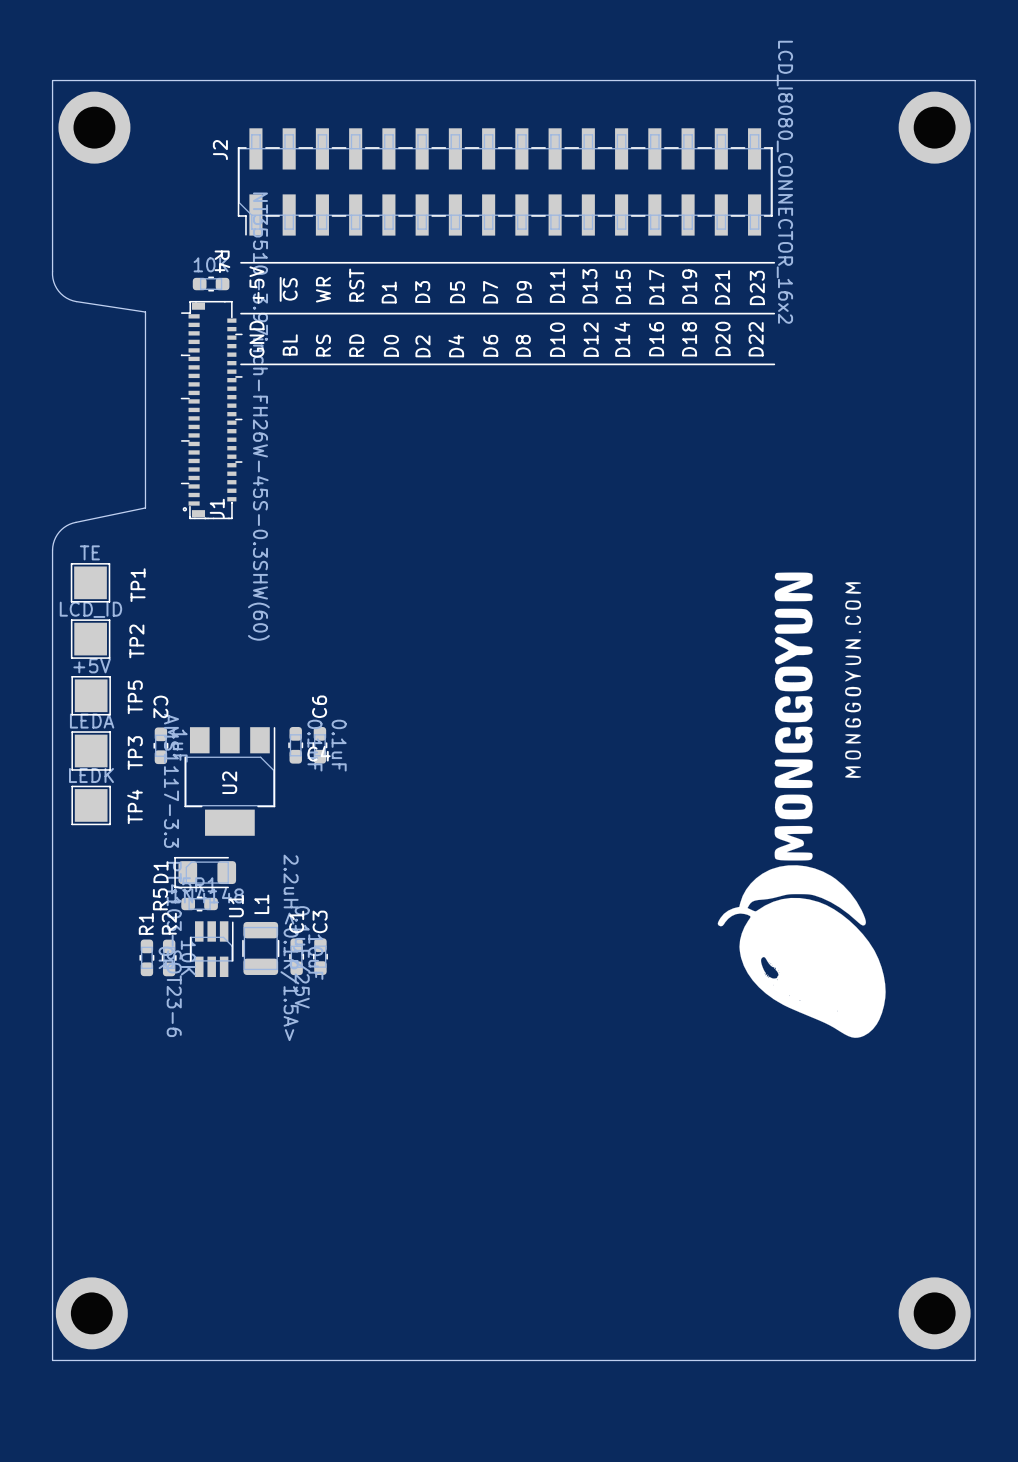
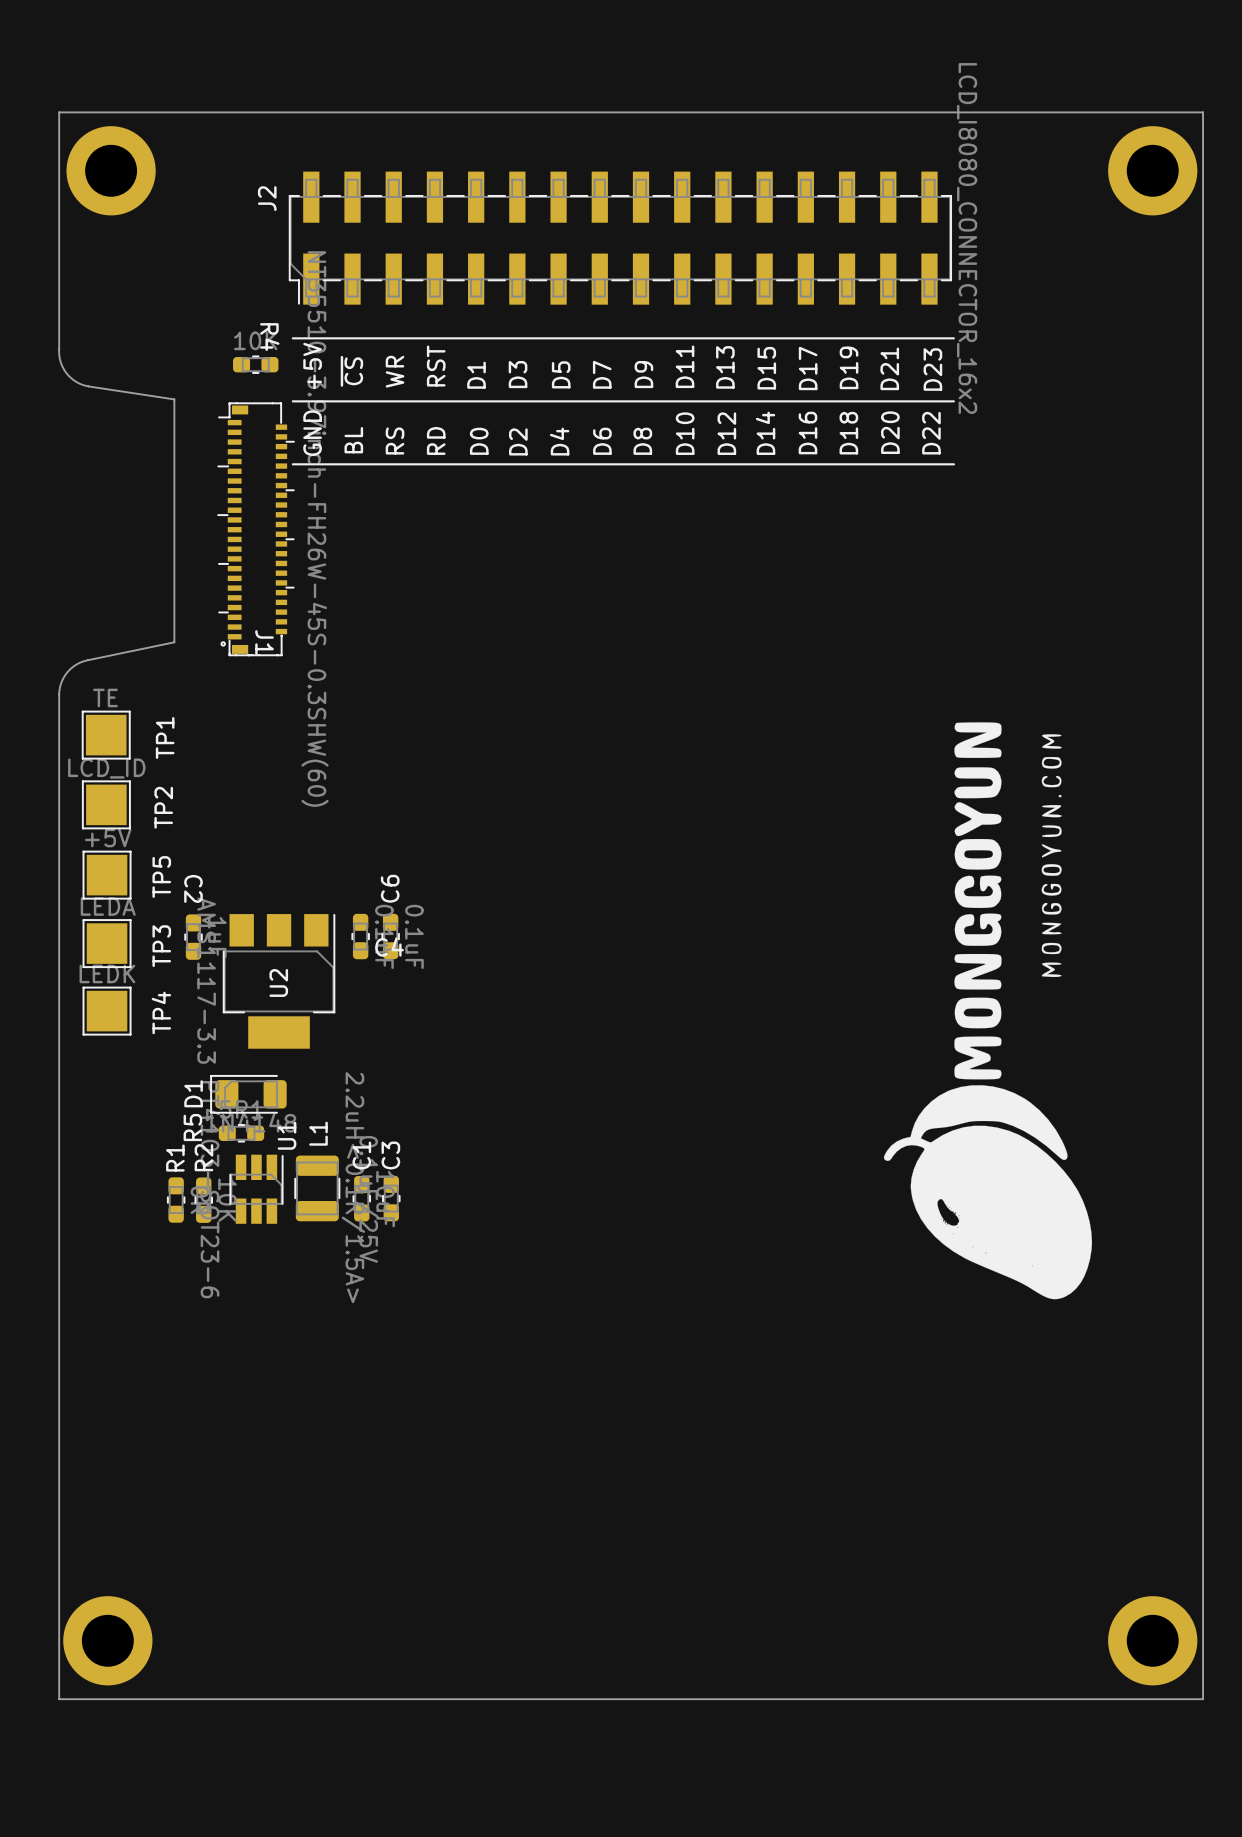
J1 footprint: [180, 300, 243, 520] -> [217, 402, 295, 657]

